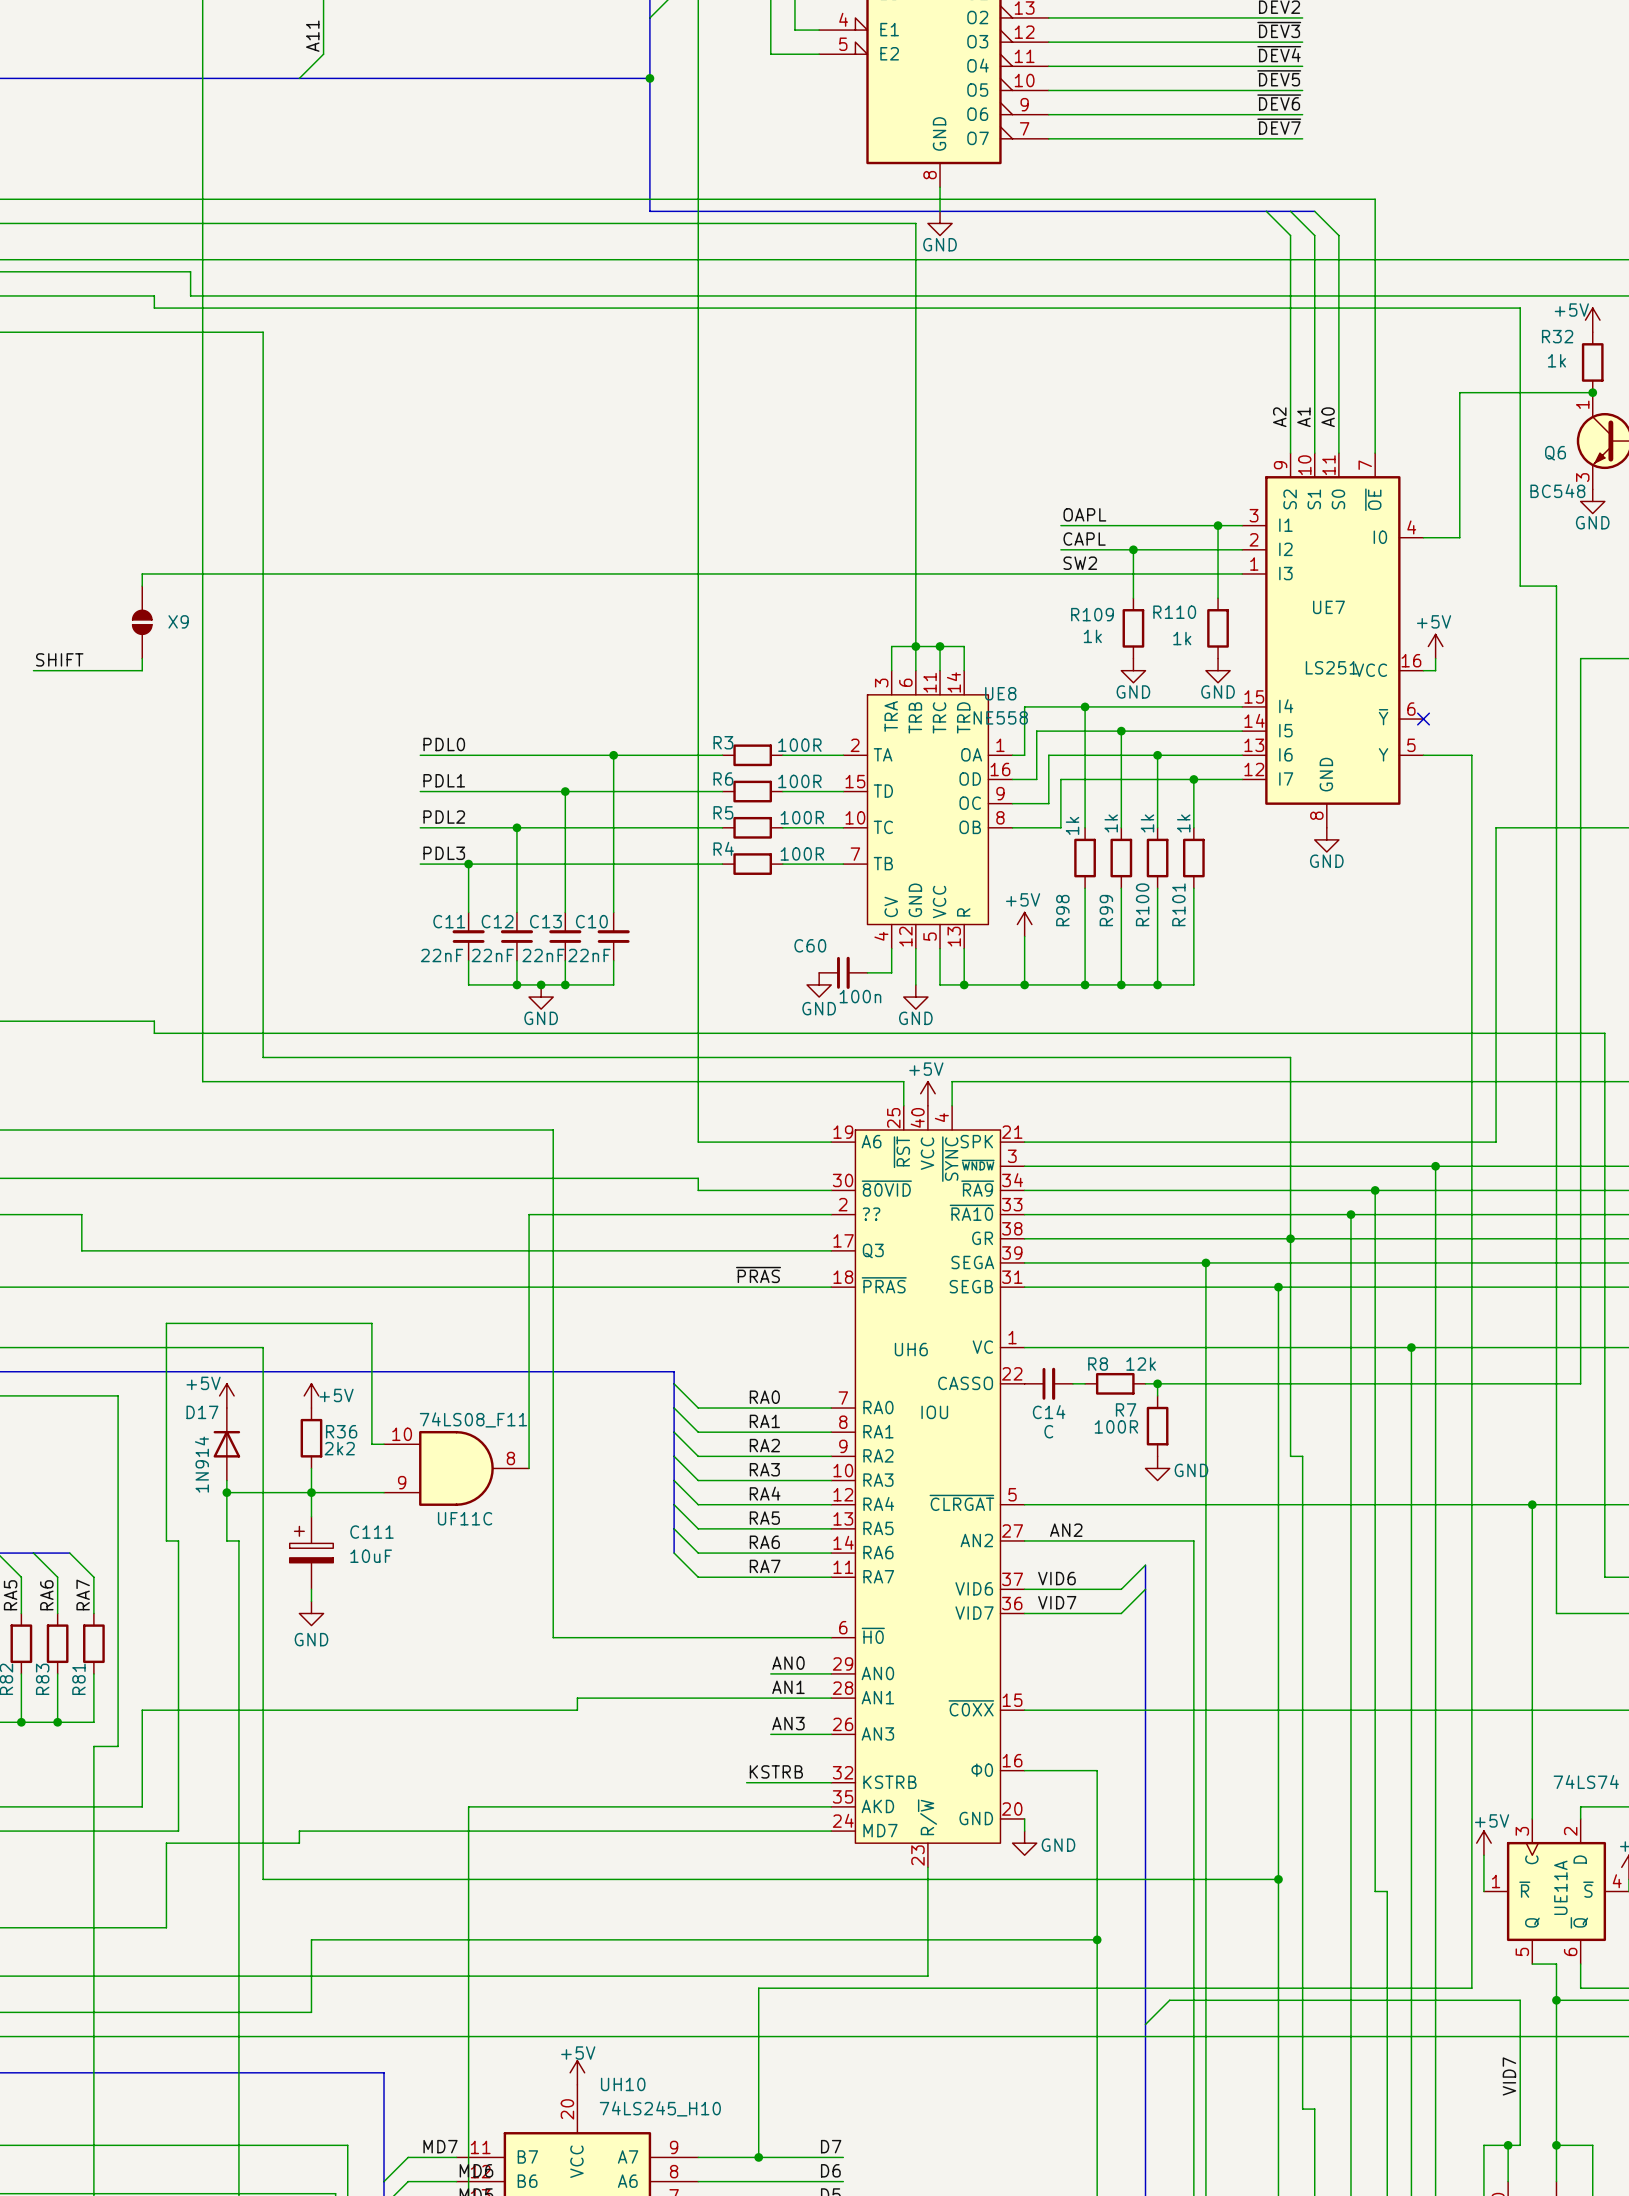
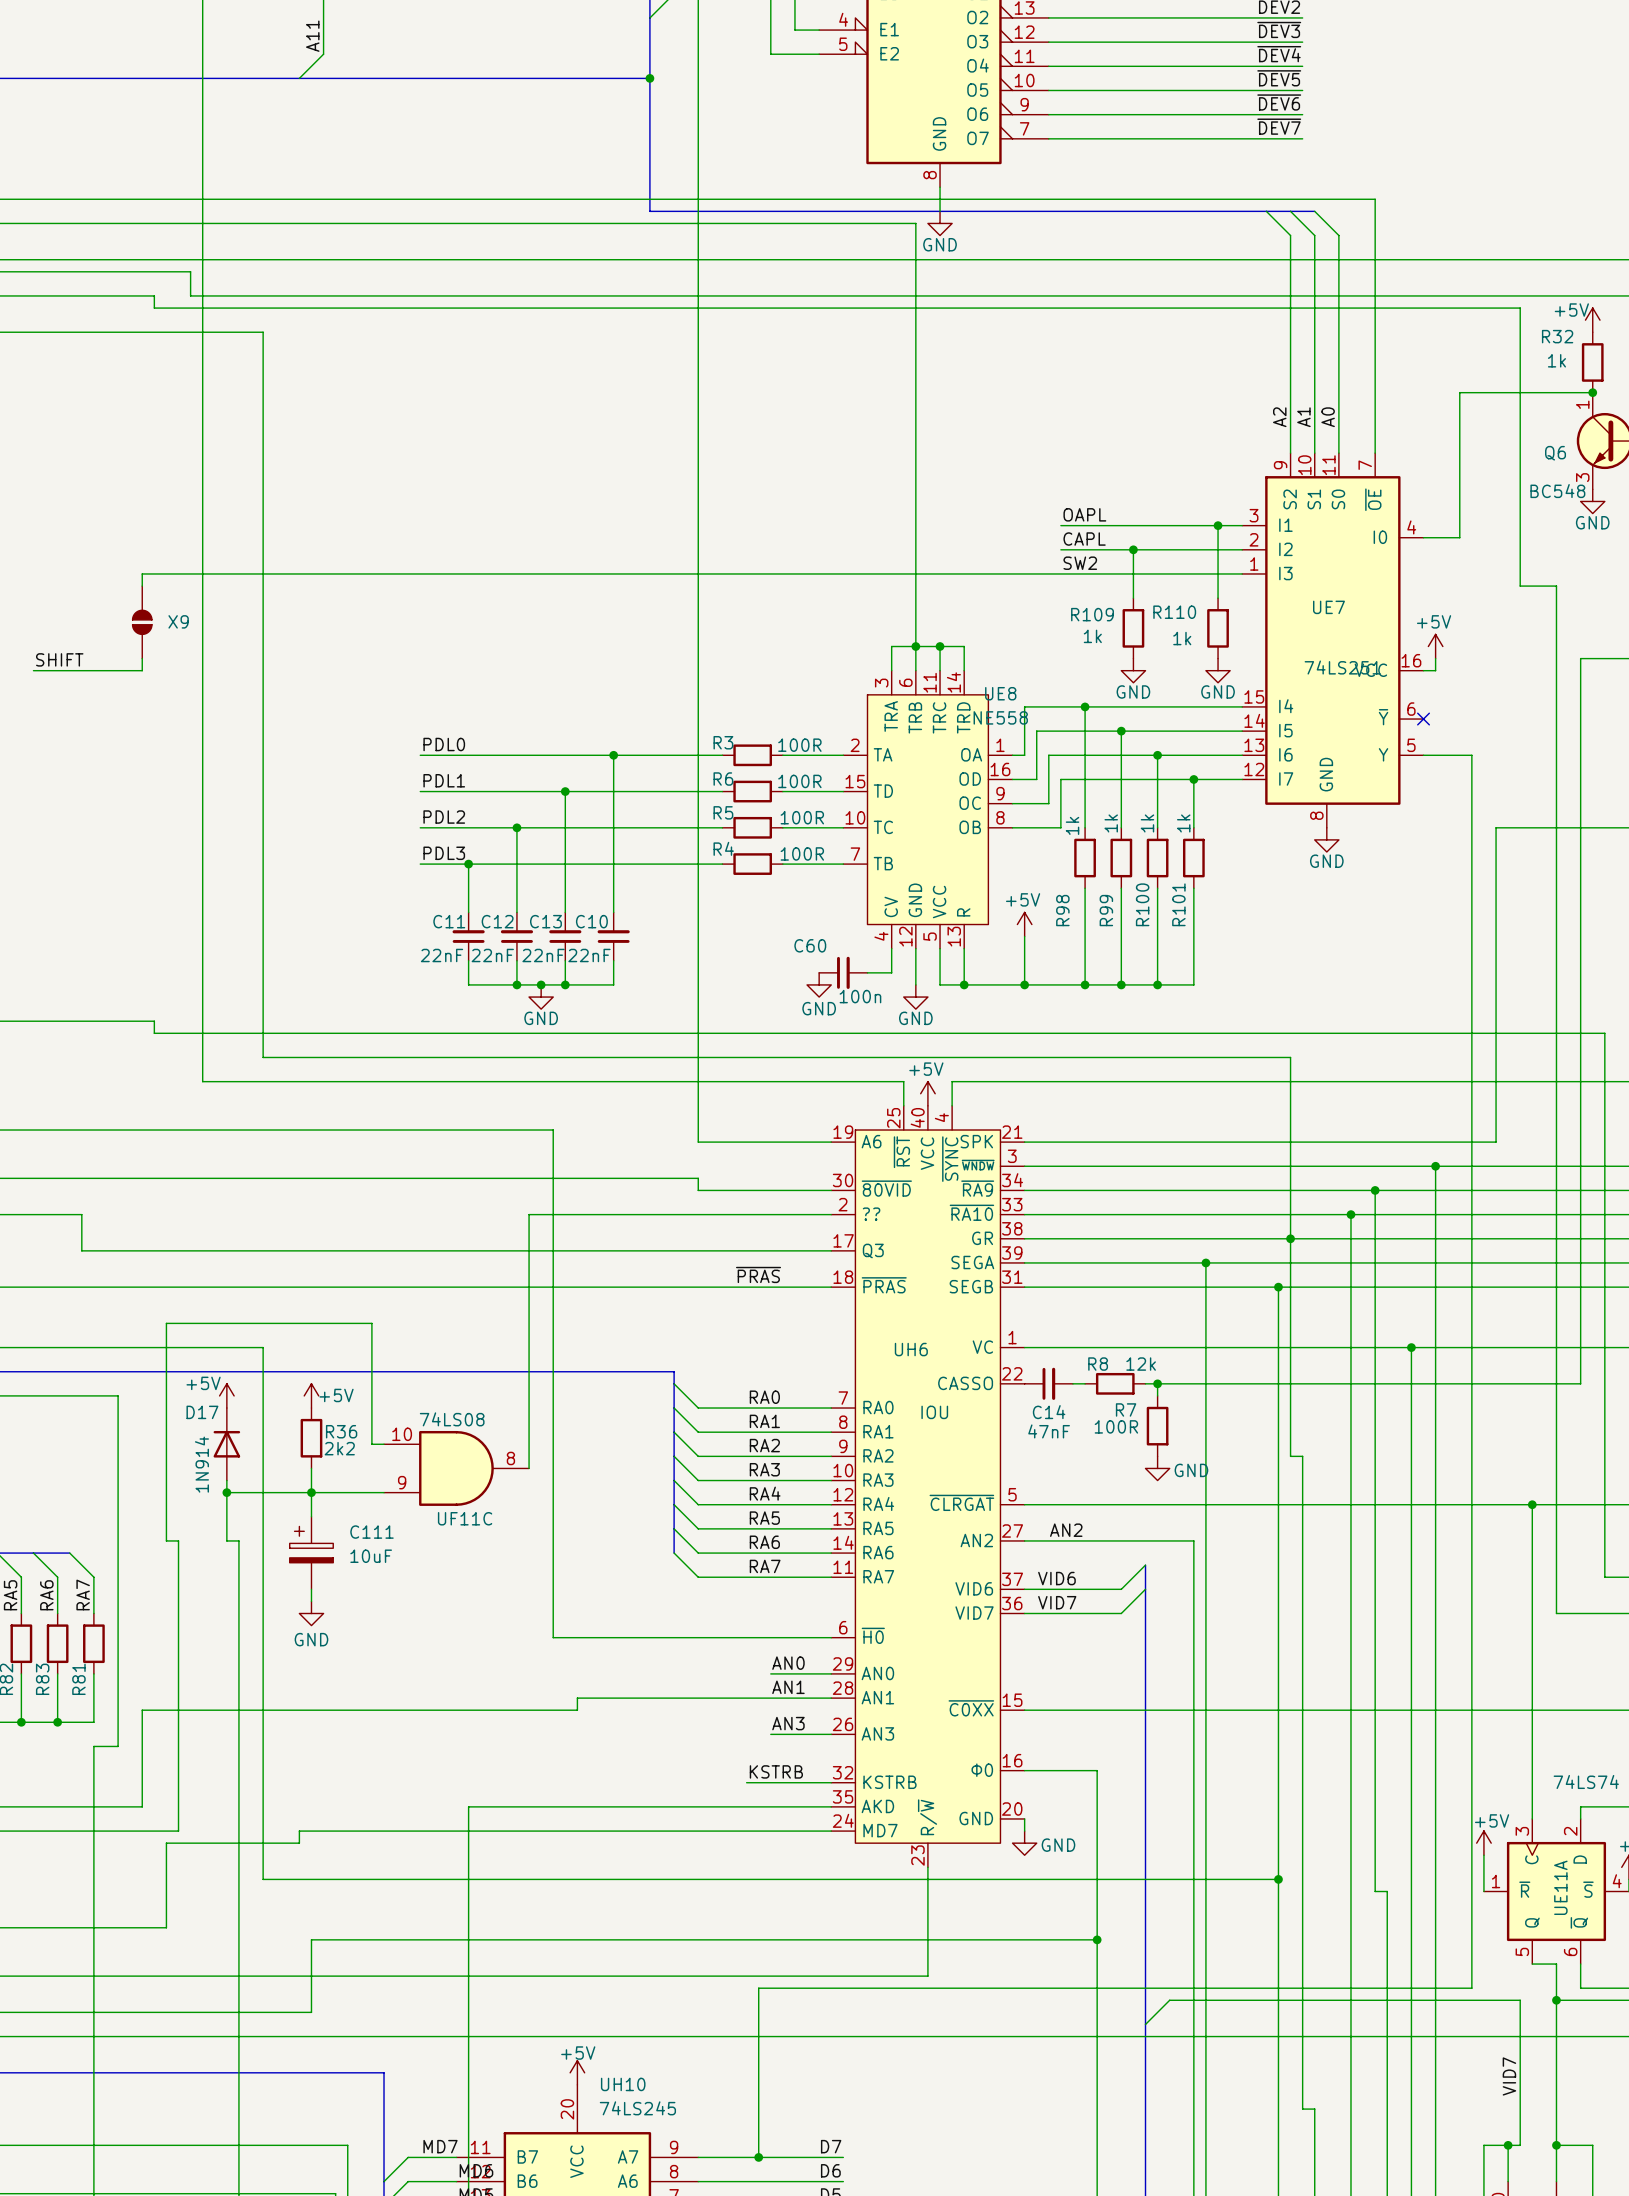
UE7 value: LS251 (1331, 667) -> 74LS251 (1342, 667)
UF11C value: 74LS08_F11 (473, 1419) -> 74LS08 (452, 1419)
C14 value: C (1048, 1431) -> 47nF (1049, 1431)
UH10 value: 74LS245_H10 (660, 2108) -> 74LS245 (637, 2108)

